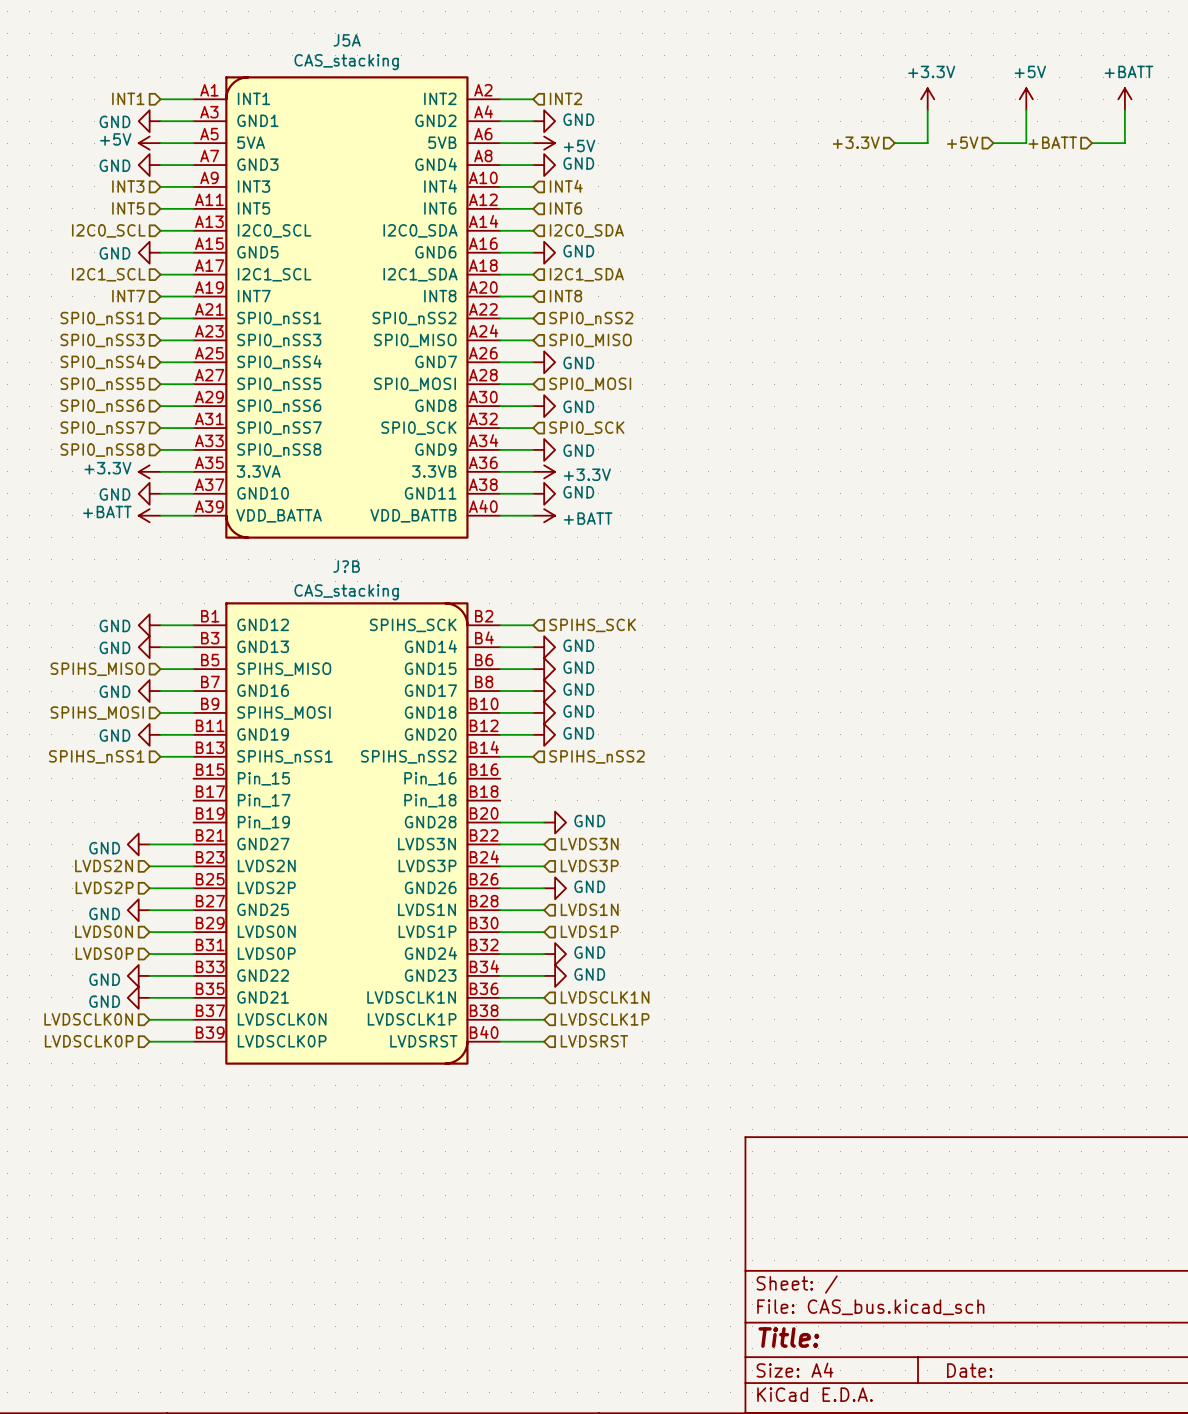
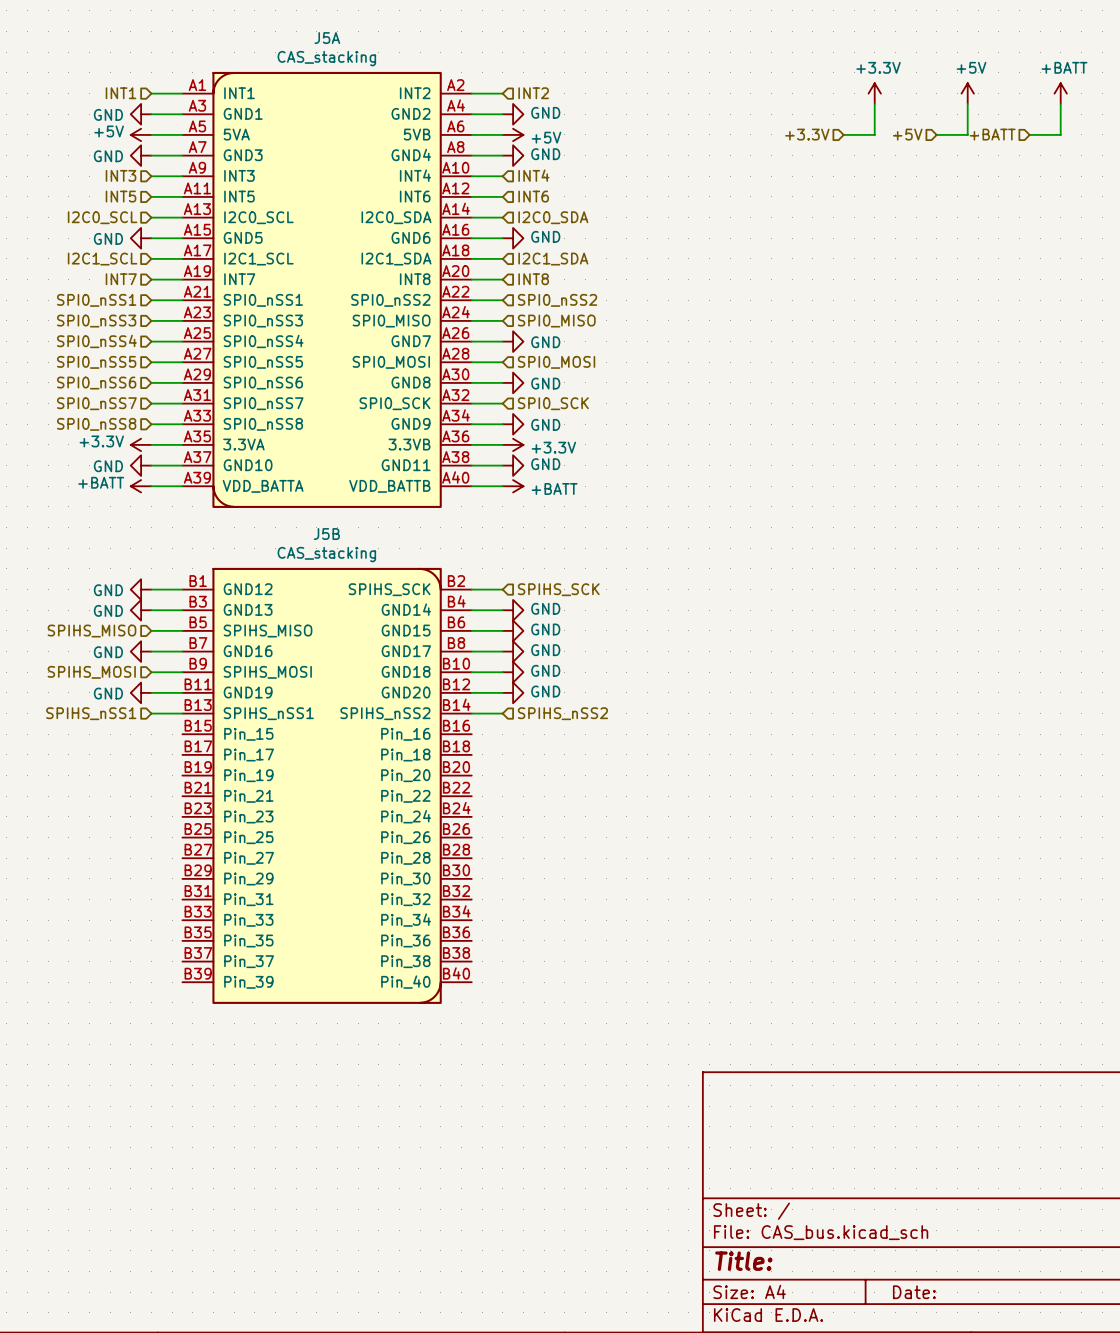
J?B name: J?B (346, 566) -> J5B (326, 534)
J?B symbol: [193, 602, 501, 1065] -> [182, 567, 472, 1004]
wire: (500, 822) (544, 822) -> none
power symbol: GND (555, 822) -> none
power symbol: GND (138, 844) -> none
wire: (149, 844) (193, 844) -> none
wire: (500, 844) (544, 844) -> none
hierarchical label: LVDS3N (589, 844) -> none
hierarchical label: LVDS2N (104, 865) -> none
hierarchical label: LVDS3P (589, 865) -> none
wire: (149, 866) (193, 866) -> none
wire: (500, 866) (544, 866) -> none
hierarchical label: LVDS2P (104, 887) -> none
wire: (149, 888) (193, 888) -> none
wire: (500, 888) (544, 888) -> none
power symbol: GND (555, 888) -> none
hierarchical label: LVDS1N (589, 909) -> none
power symbol: GND (138, 910) -> none
wire: (149, 910) (193, 910) -> none
wire: (500, 910) (544, 910) -> none
hierarchical label: LVDS0N (104, 931) -> none
hierarchical label: LVDS1P (589, 931) -> none
wire: (149, 932) (193, 932) -> none
wire: (500, 932) (544, 932) -> none
hierarchical label: LVDS0P (104, 953) -> none
wire: (149, 954) (193, 954) -> none
wire: (500, 954) (544, 954) -> none
power symbol: GND (555, 954) -> none
power symbol: GND (138, 975) -> none
wire: (149, 975) (193, 975) -> none
wire: (500, 975) (544, 975) -> none
power symbol: GND (555, 975) -> none
power symbol: GND (138, 997) -> none
wire: (149, 997) (193, 997) -> none
wire: (500, 997) (544, 997) -> none
hierarchical label: LVDSCLK1N (605, 997) -> none
hierarchical label: LVDSCLK0N (88, 1019) -> none
wire: (149, 1019) (193, 1019) -> none
wire: (500, 1019) (544, 1019) -> none
hierarchical label: LVDSCLK1P (605, 1019) -> none
hierarchical label: LVDSCLK0P (89, 1041) -> none
wire: (149, 1041) (193, 1041) -> none
wire: (500, 1041) (544, 1041) -> none
hierarchical label: LVDSRST (594, 1041) -> none

